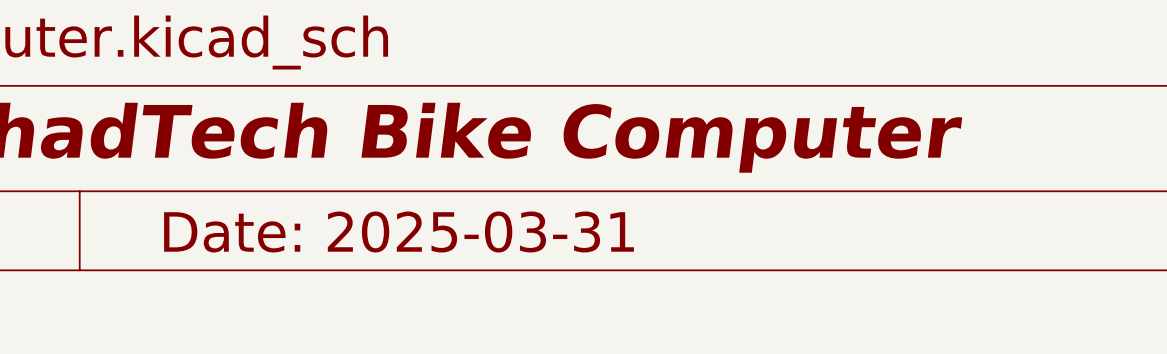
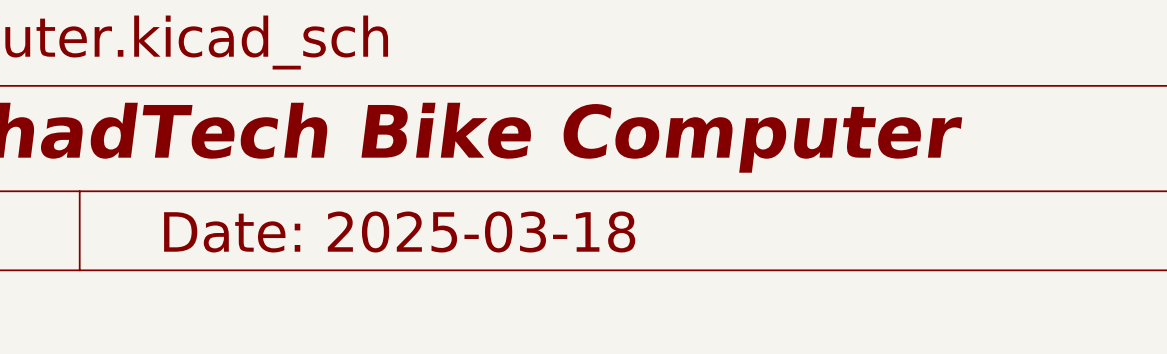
title block: Date: 2025-03-31 (399, 231) -> Date: 2025-03-18 (399, 231)

